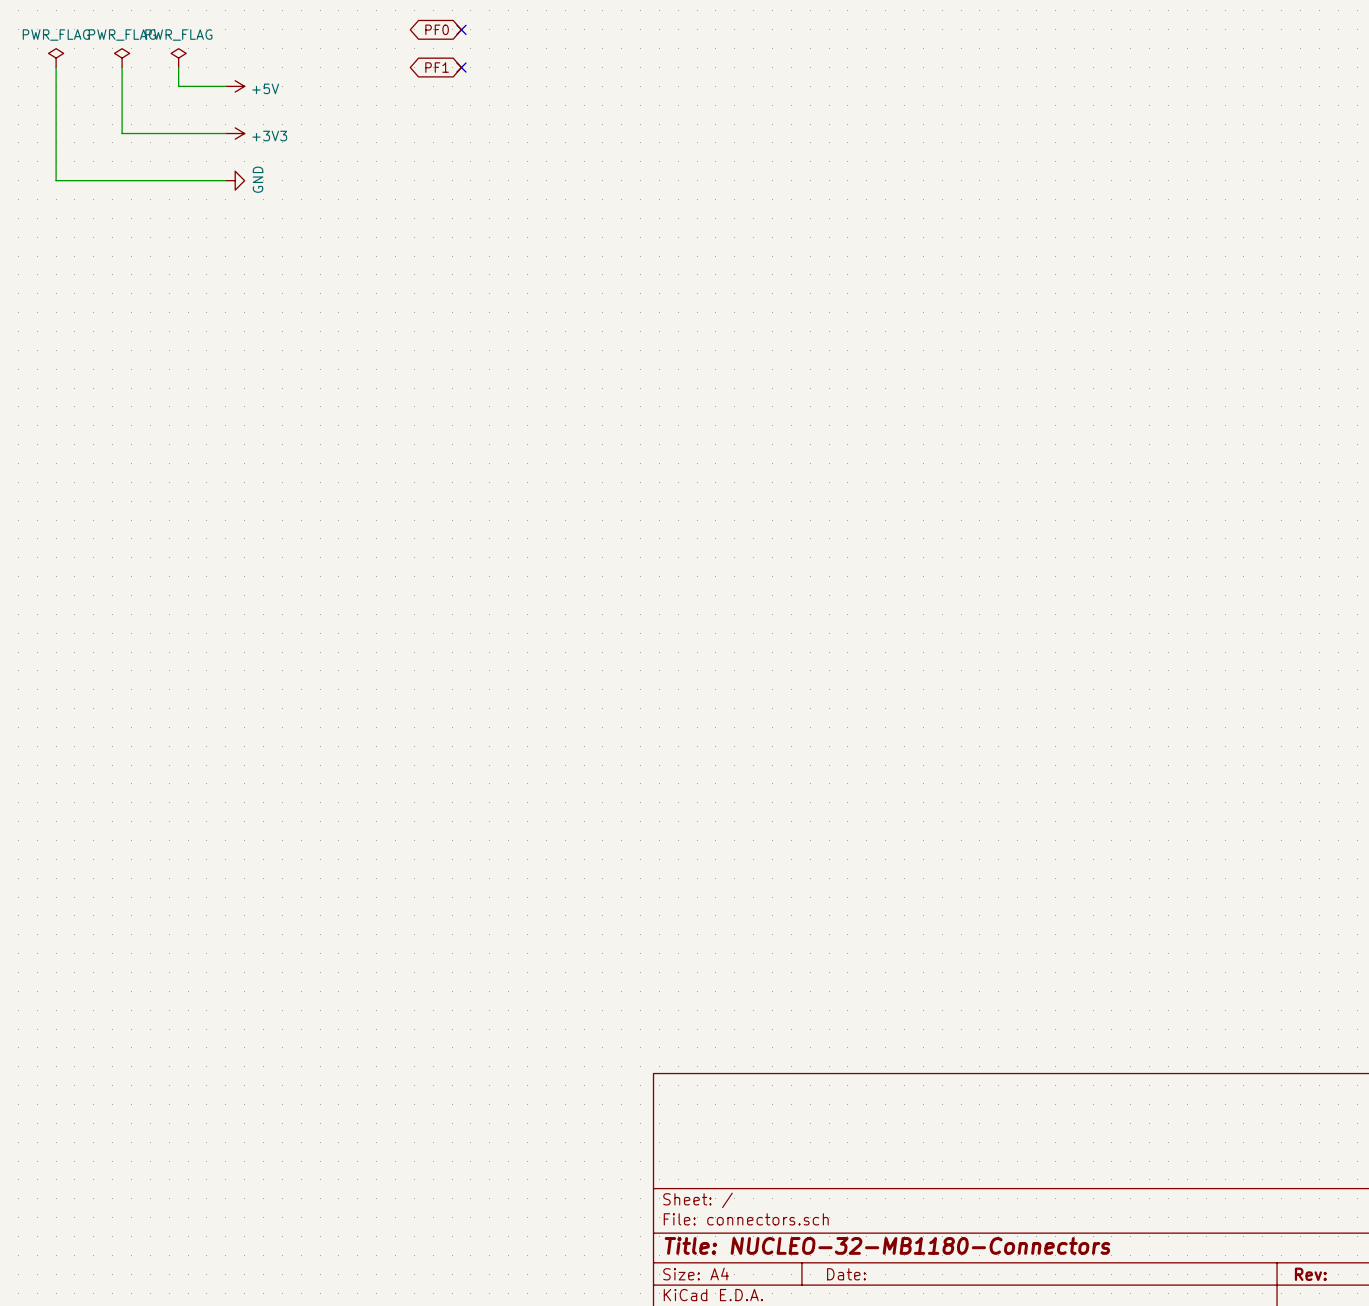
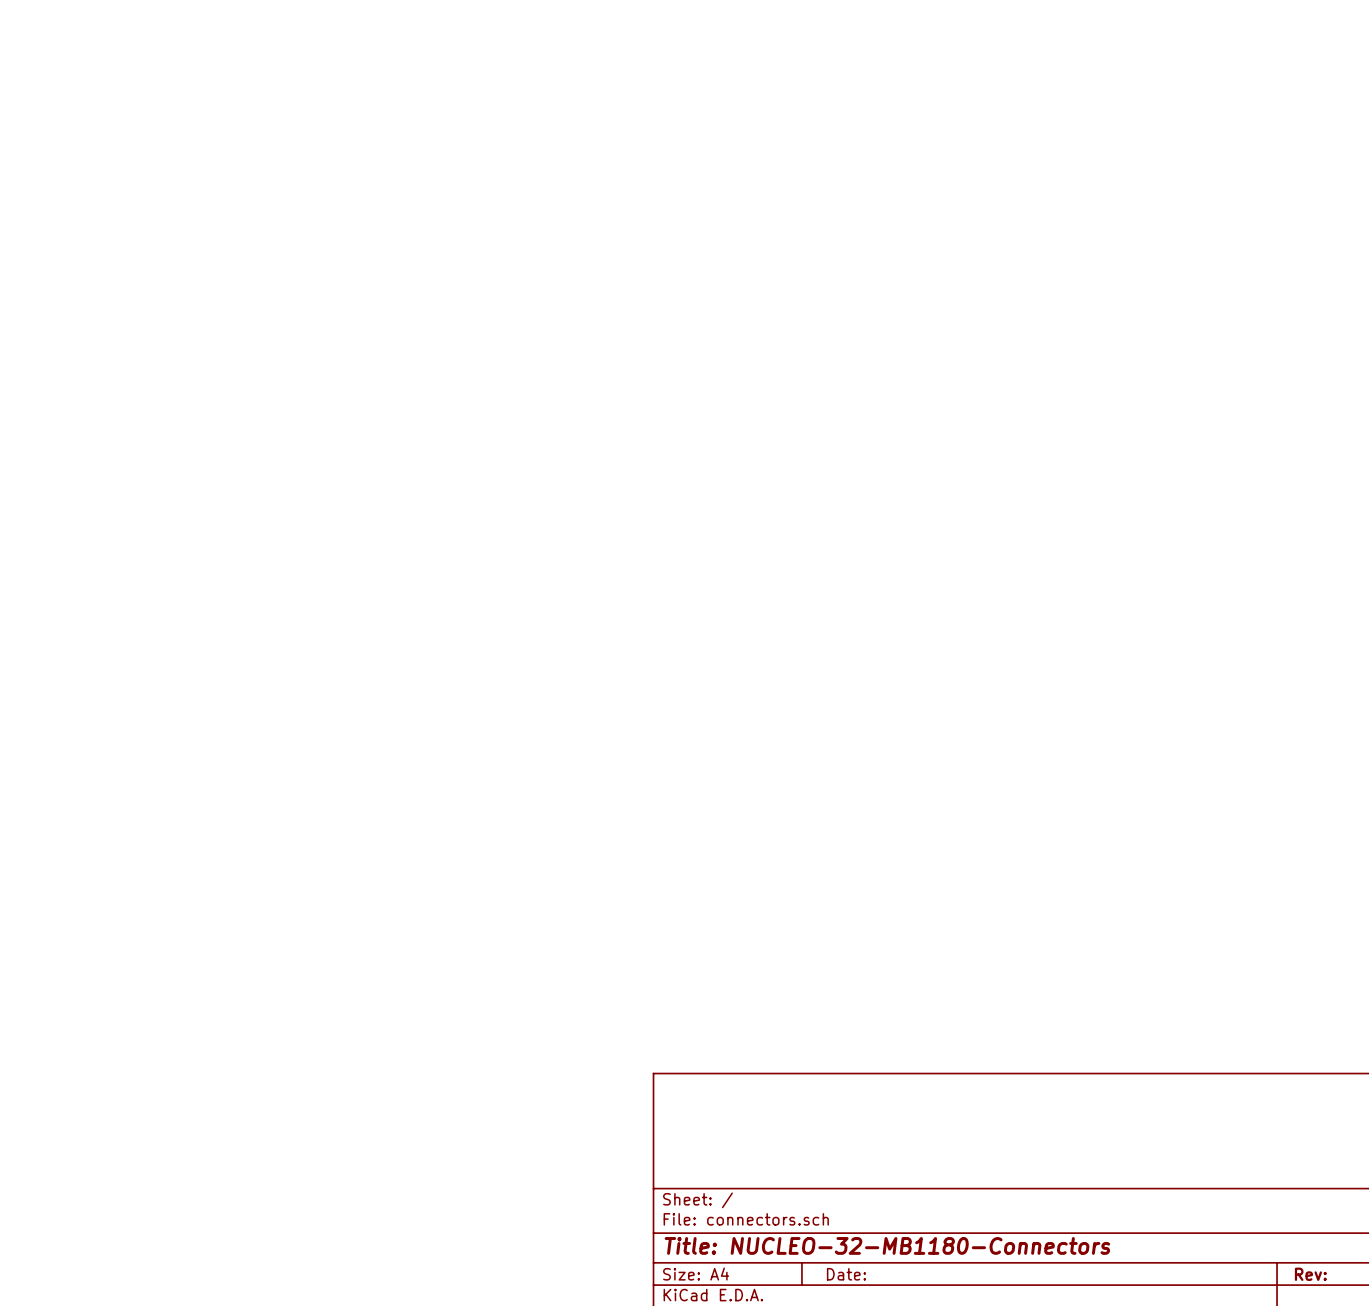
global label: PF0 (437, 29) -> none
no-connect mark: (461, 29) -> none
power symbol: PWR_FLAG (56, 58) -> none
power symbol: PWR_FLAG (122, 58) -> none
power symbol: PWR_FLAG (178, 58) -> none
wire: (56, 67) (56, 180) (225, 180) -> none
wire: (122, 67) (122, 133) (225, 133) -> none
wire: (178, 67) (178, 86) (225, 86) -> none
global label: PF1 (437, 67) -> none
no-connect mark: (461, 67) -> none
power symbol: +5V (235, 86) -> none
power symbol: +3V3 (235, 133) -> none
power symbol: GND (235, 180) -> none

